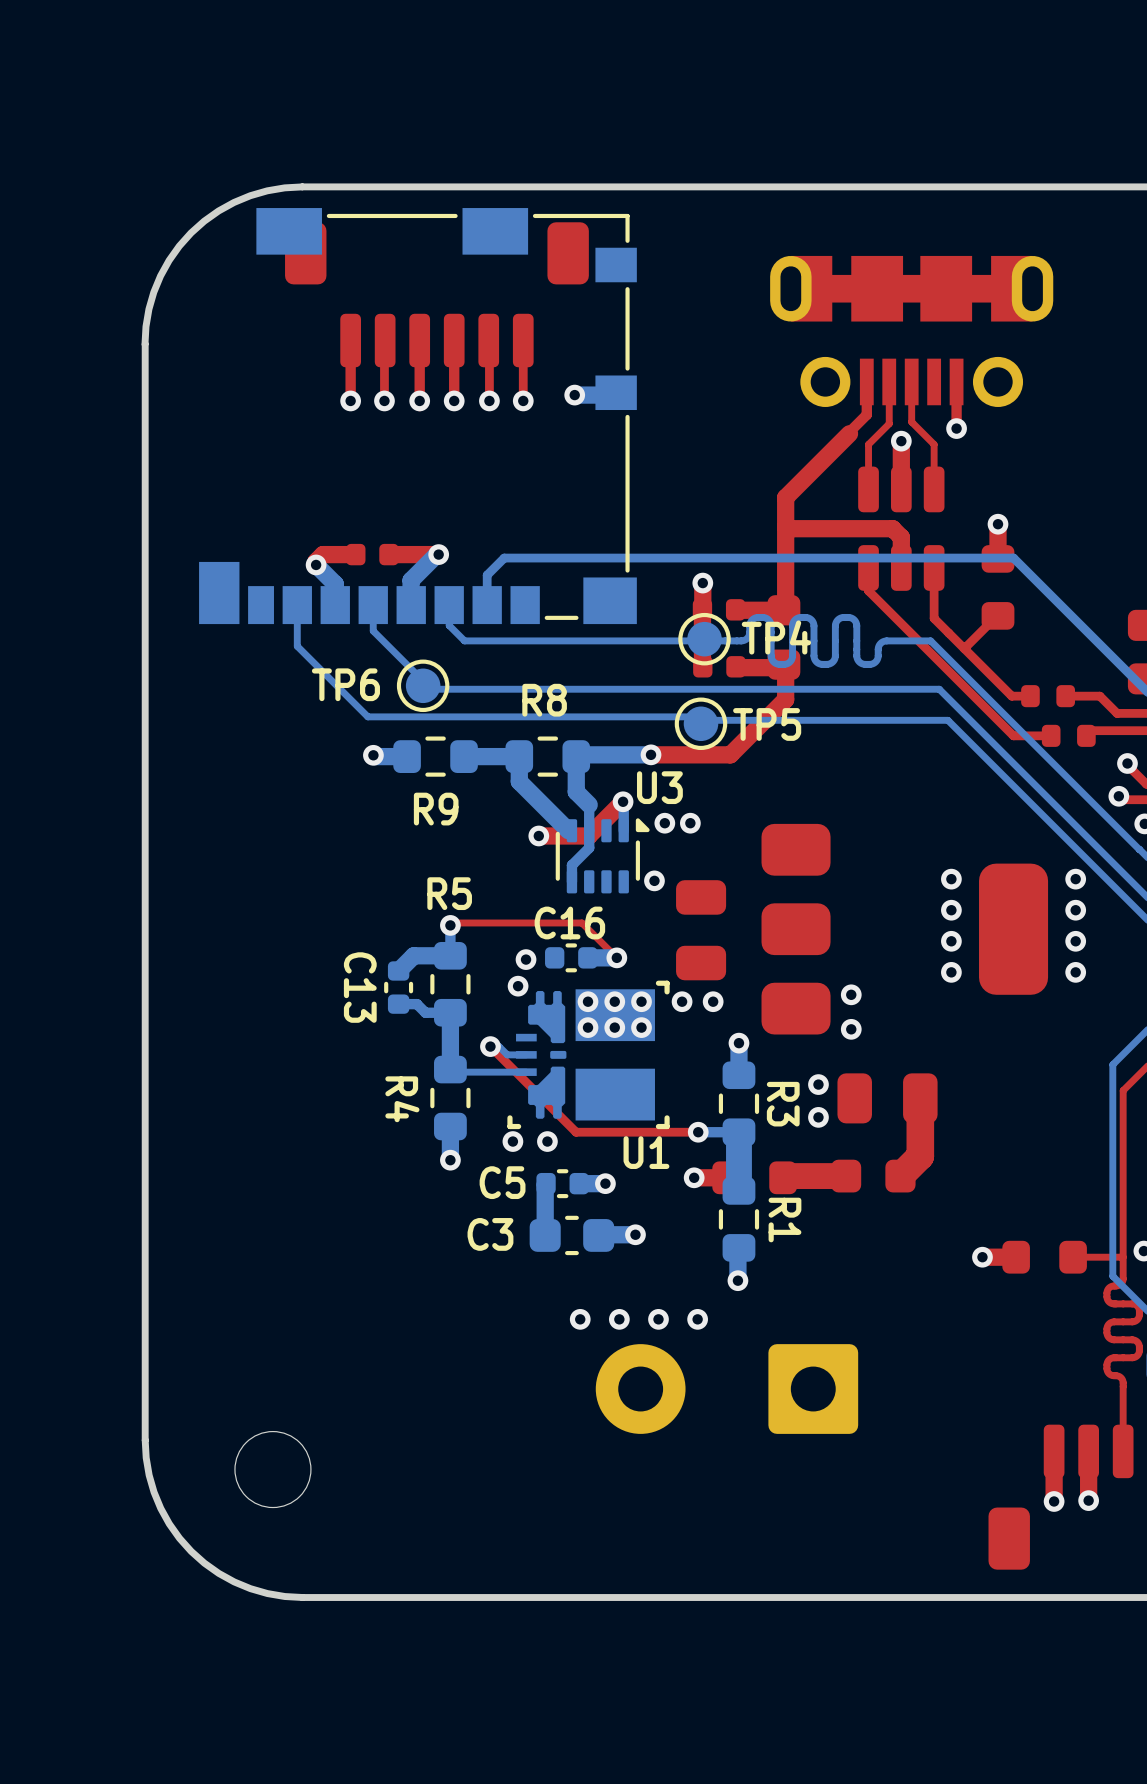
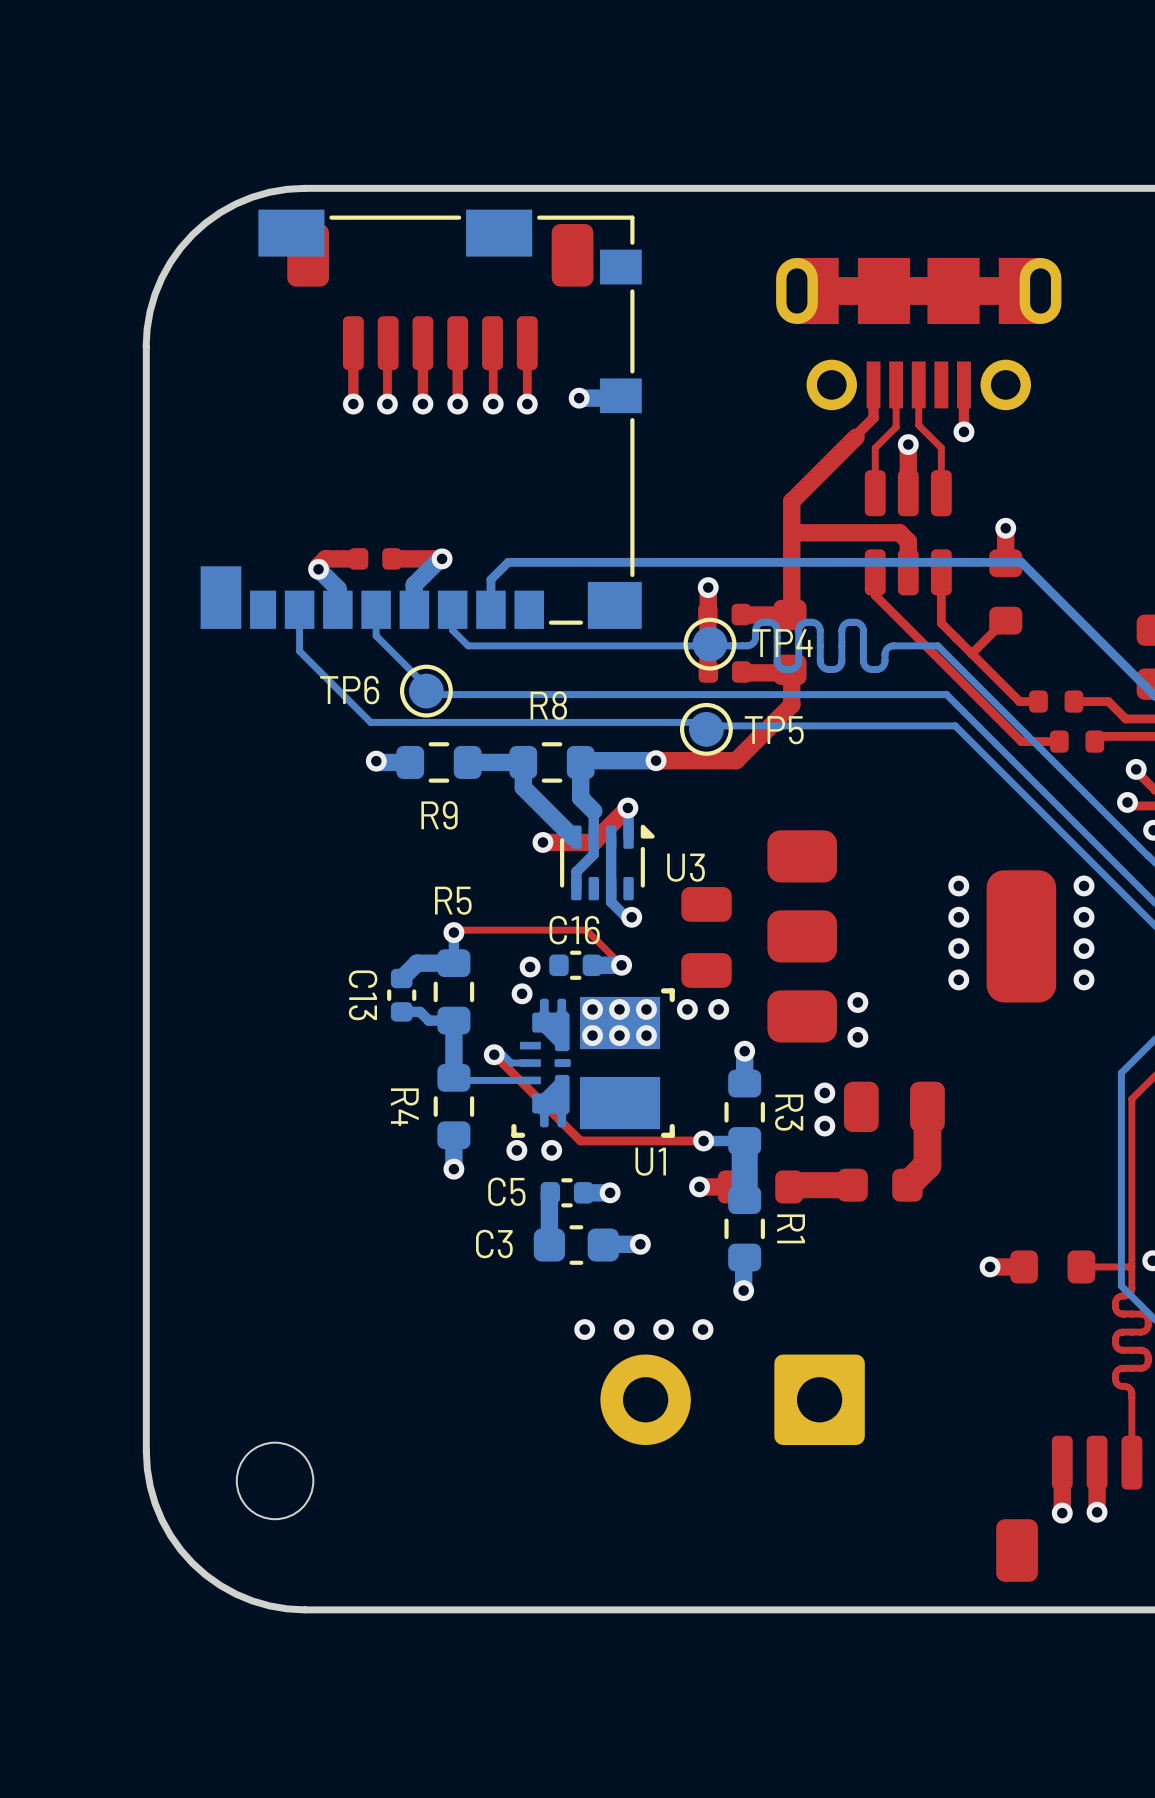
U3 name position: U3 (659, 787) -> U3 (686, 867)
via: (664, 823) -> none
via: (690, 823) -> none
bottom track: none -> (611, 837) (611, 902) (626, 917) (631, 917)
via position: (654, 880) -> (631, 917)

